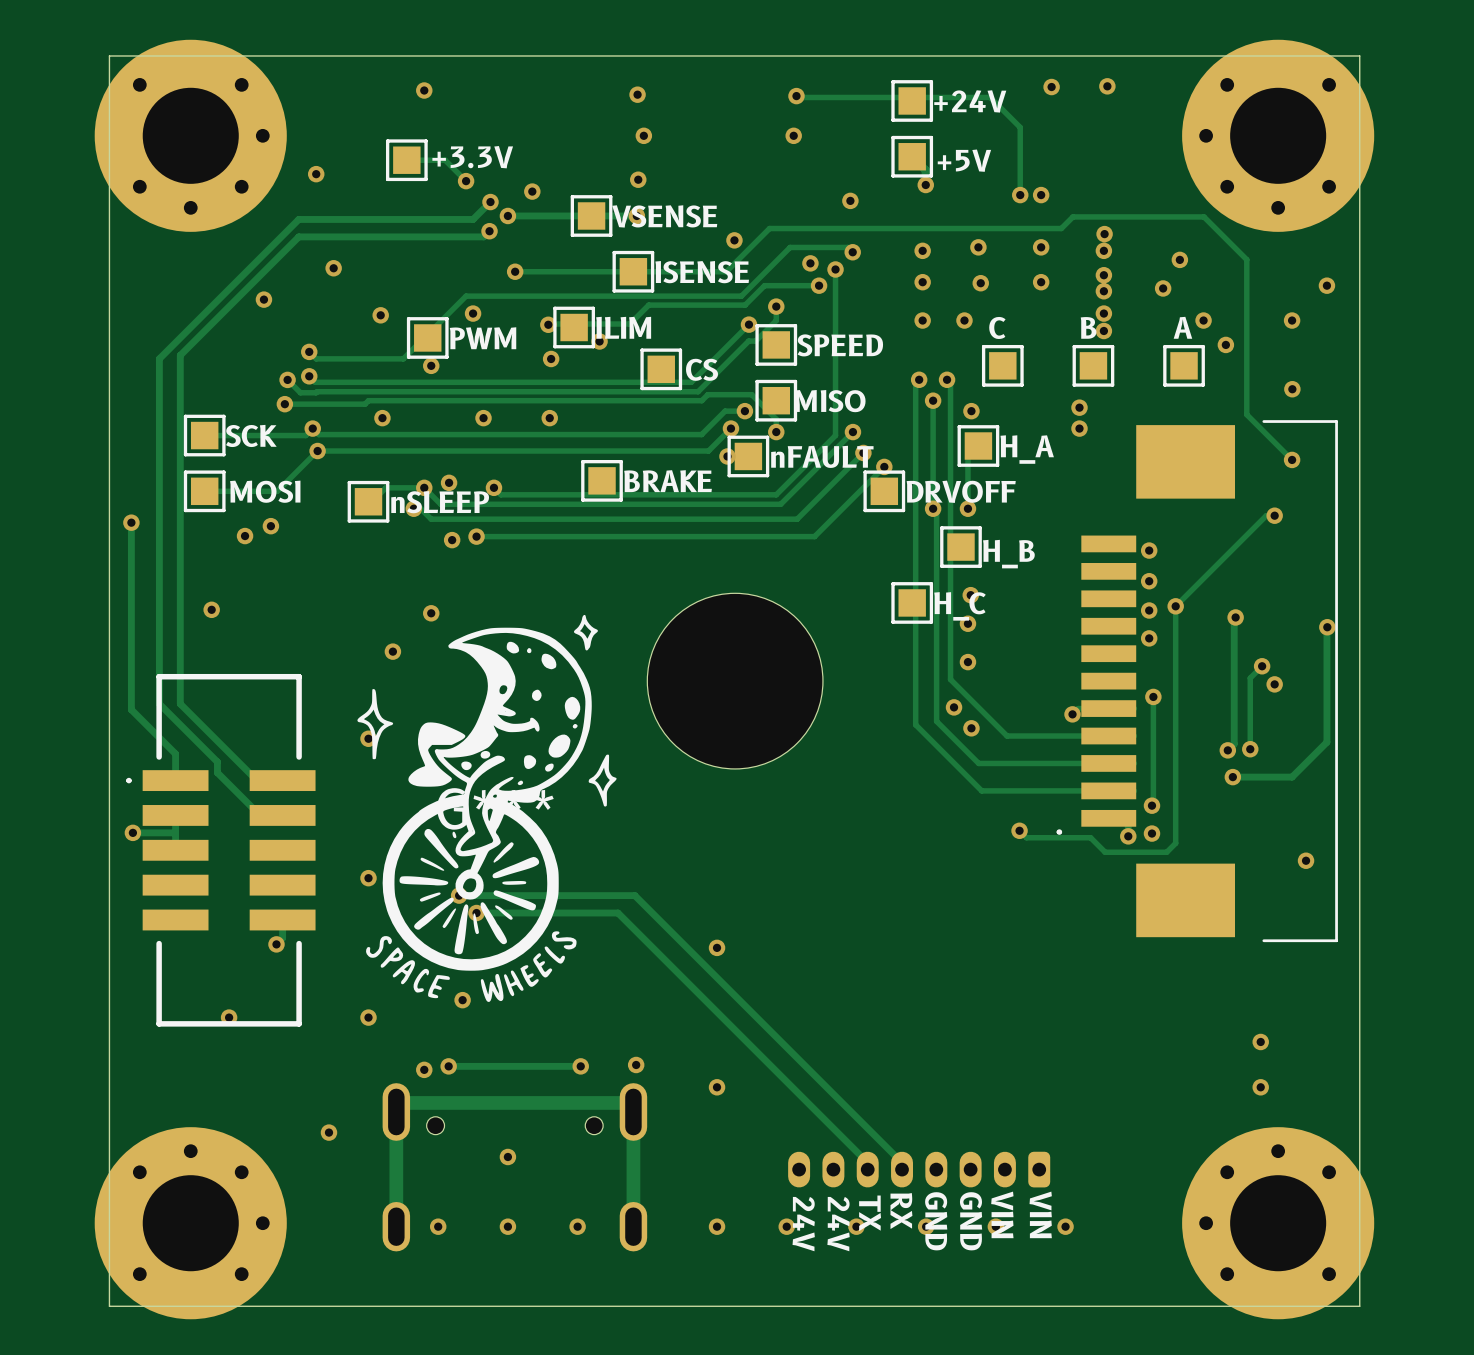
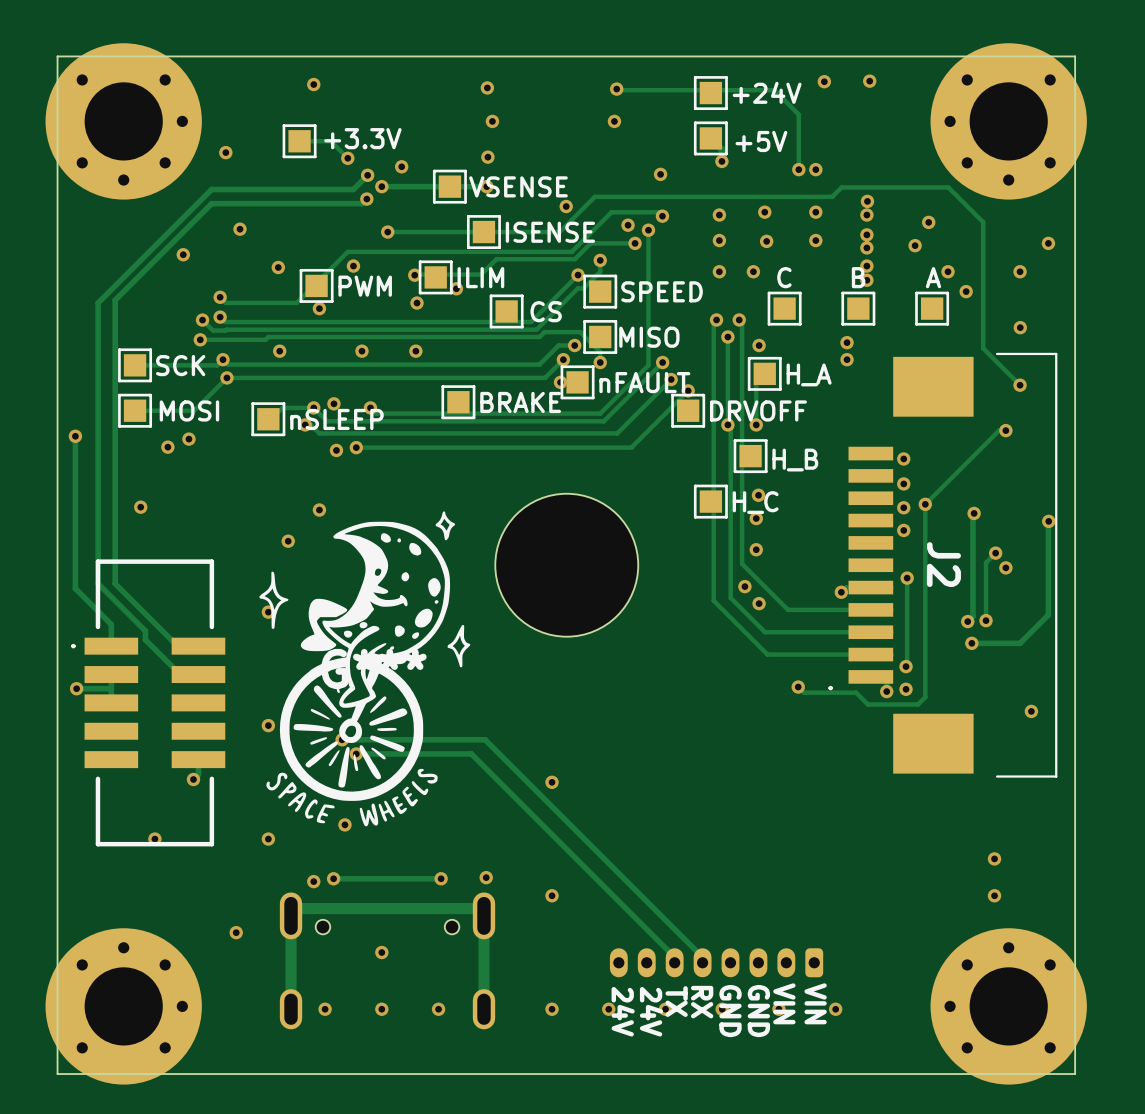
J2 name: none -> J2 (943, 564)

